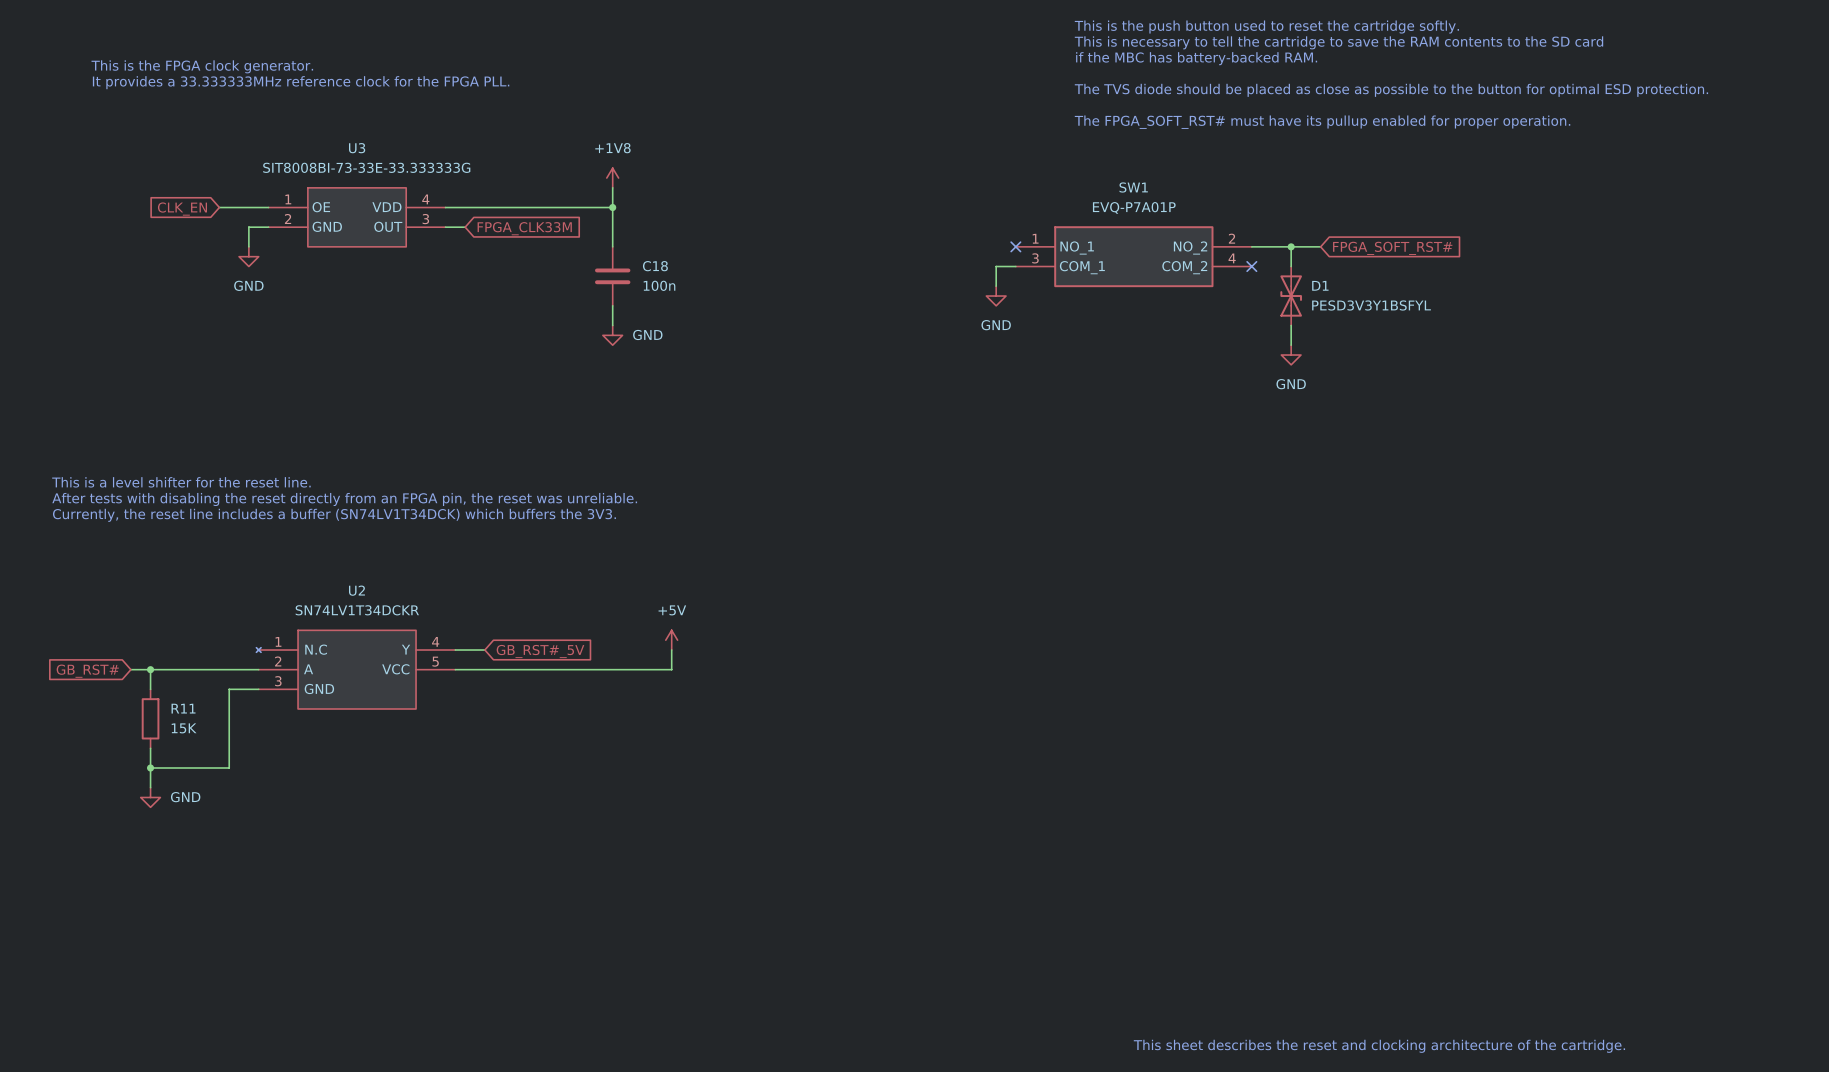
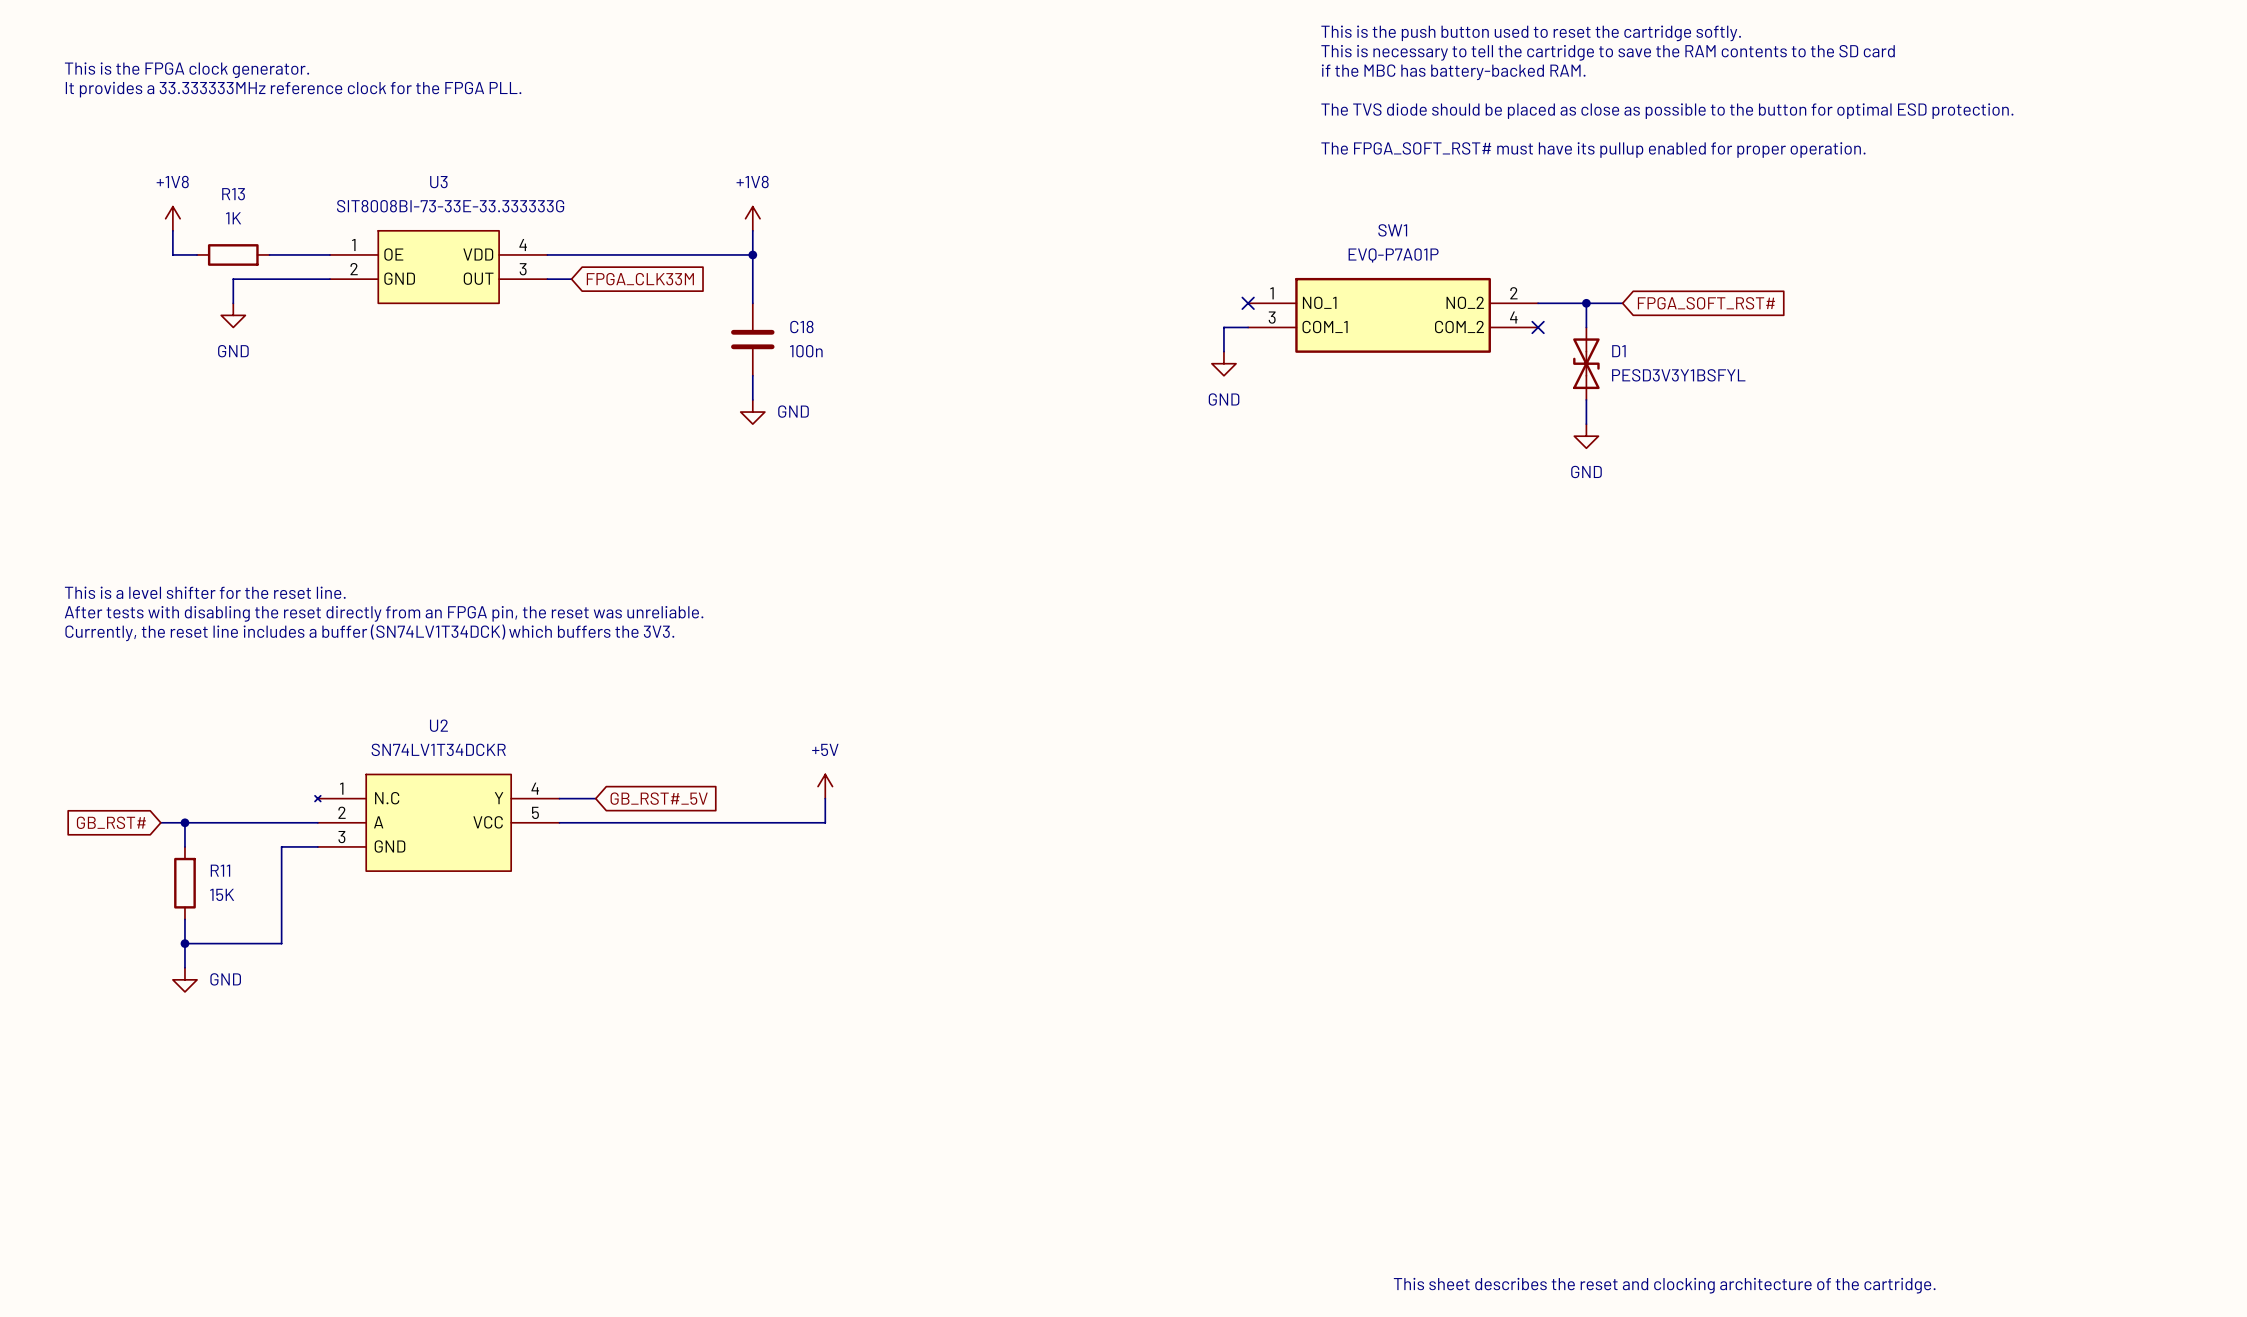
text position: This is the FPGA clock generator. (202, 66) -> This is the FPGA clock generator. (187, 70)
text position: It provides a 33.333333MHz reference clock for the FPGA PLL. (301, 82) -> It provides a 33.333333MHz reference clock for the FPGA PLL. (293, 89)
power symbol: none -> +1V8 (172, 218)
wire: none -> (172, 230) (172, 254) (197, 254)
R13: none -> 1K (233, 254)
global label: CLK_EN (182, 209) -> none
wire: (248, 227) (248, 246) -> (305, 279) (233, 279) (233, 303)
power symbol position: GND (248, 256) -> GND (233, 315)

